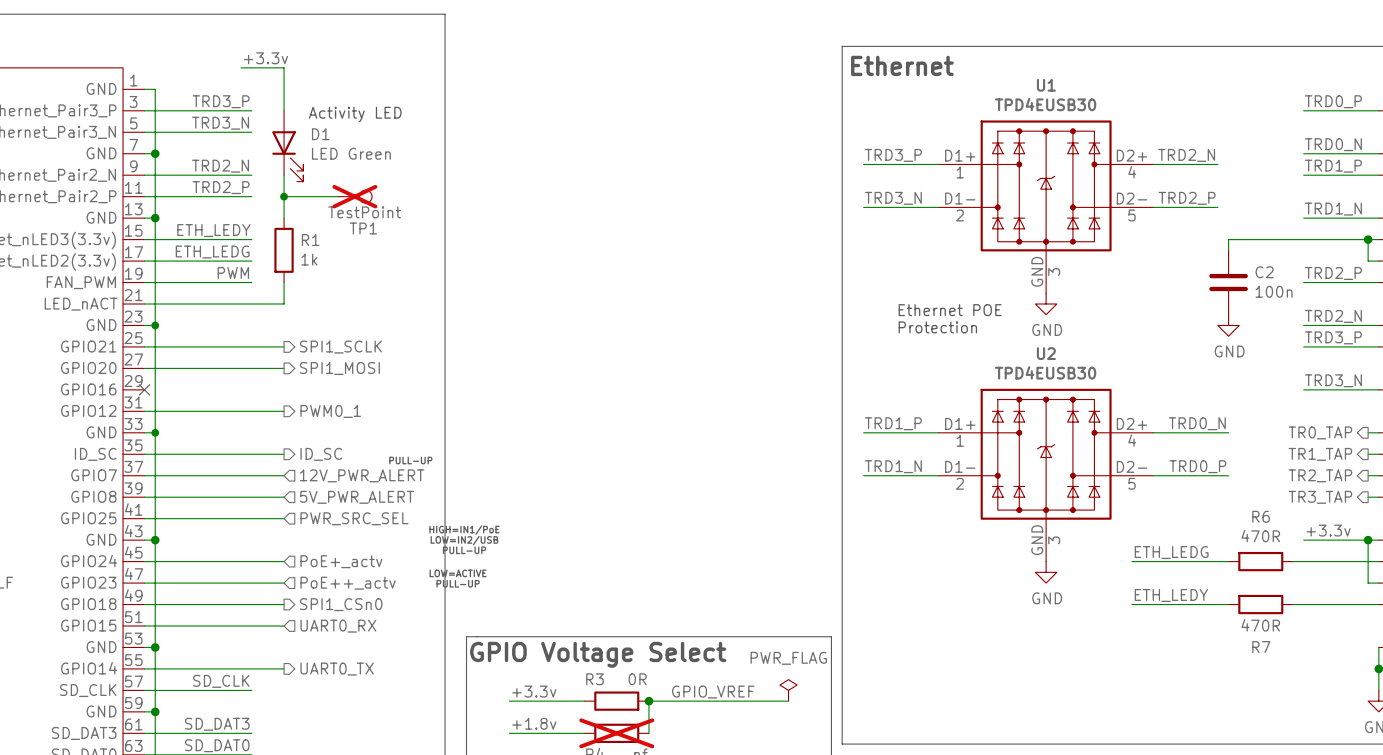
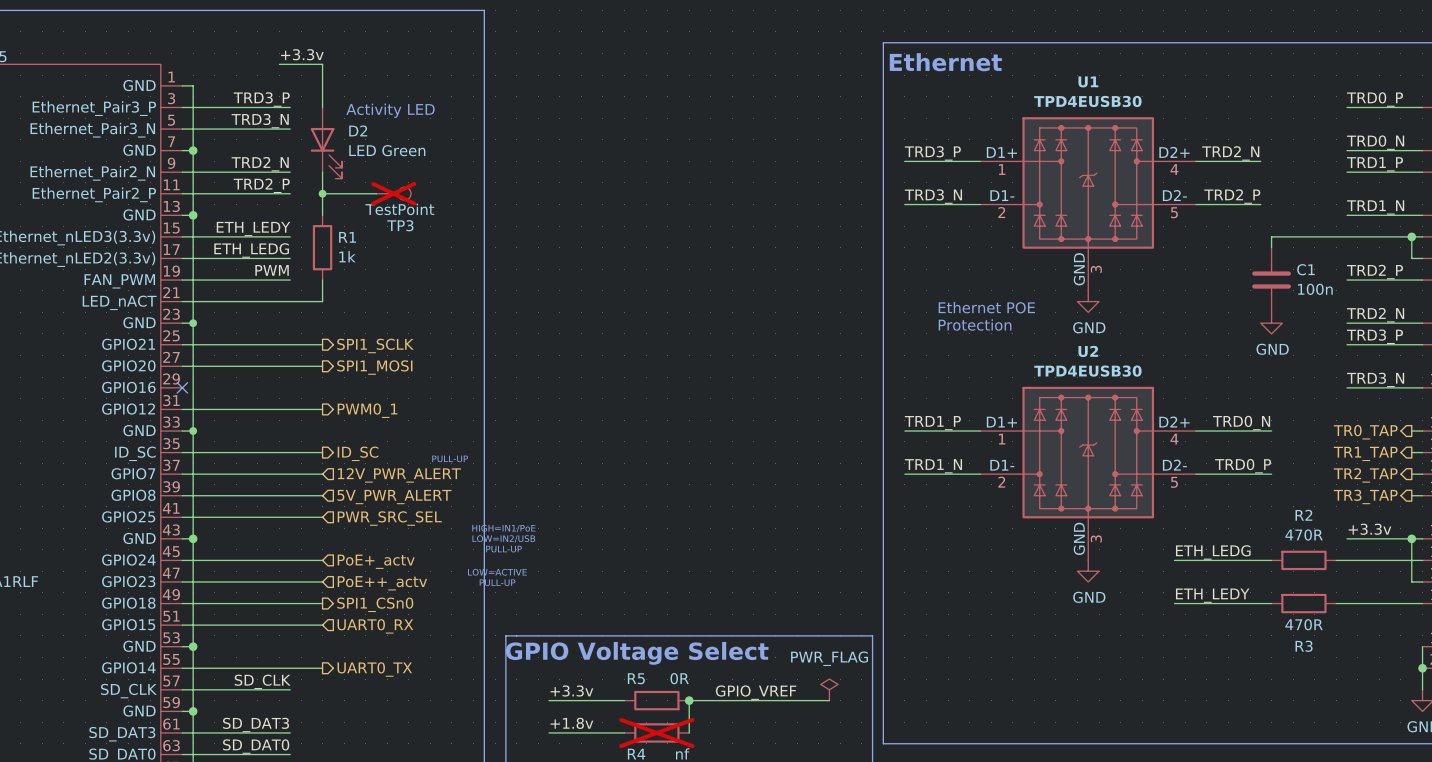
D1 name: D1 (320, 134) -> D2 (358, 130)
TP1 name: TP1 (363, 228) -> TP3 (400, 225)
C2 name: C2 (1264, 272) -> C1 (1305, 269)
R6 name: R6 (1261, 516) -> R2 (1303, 515)
R7 name: R7 (1261, 647) -> R3 (1304, 646)
R3 name: R3 (594, 679) -> R5 (636, 678)

